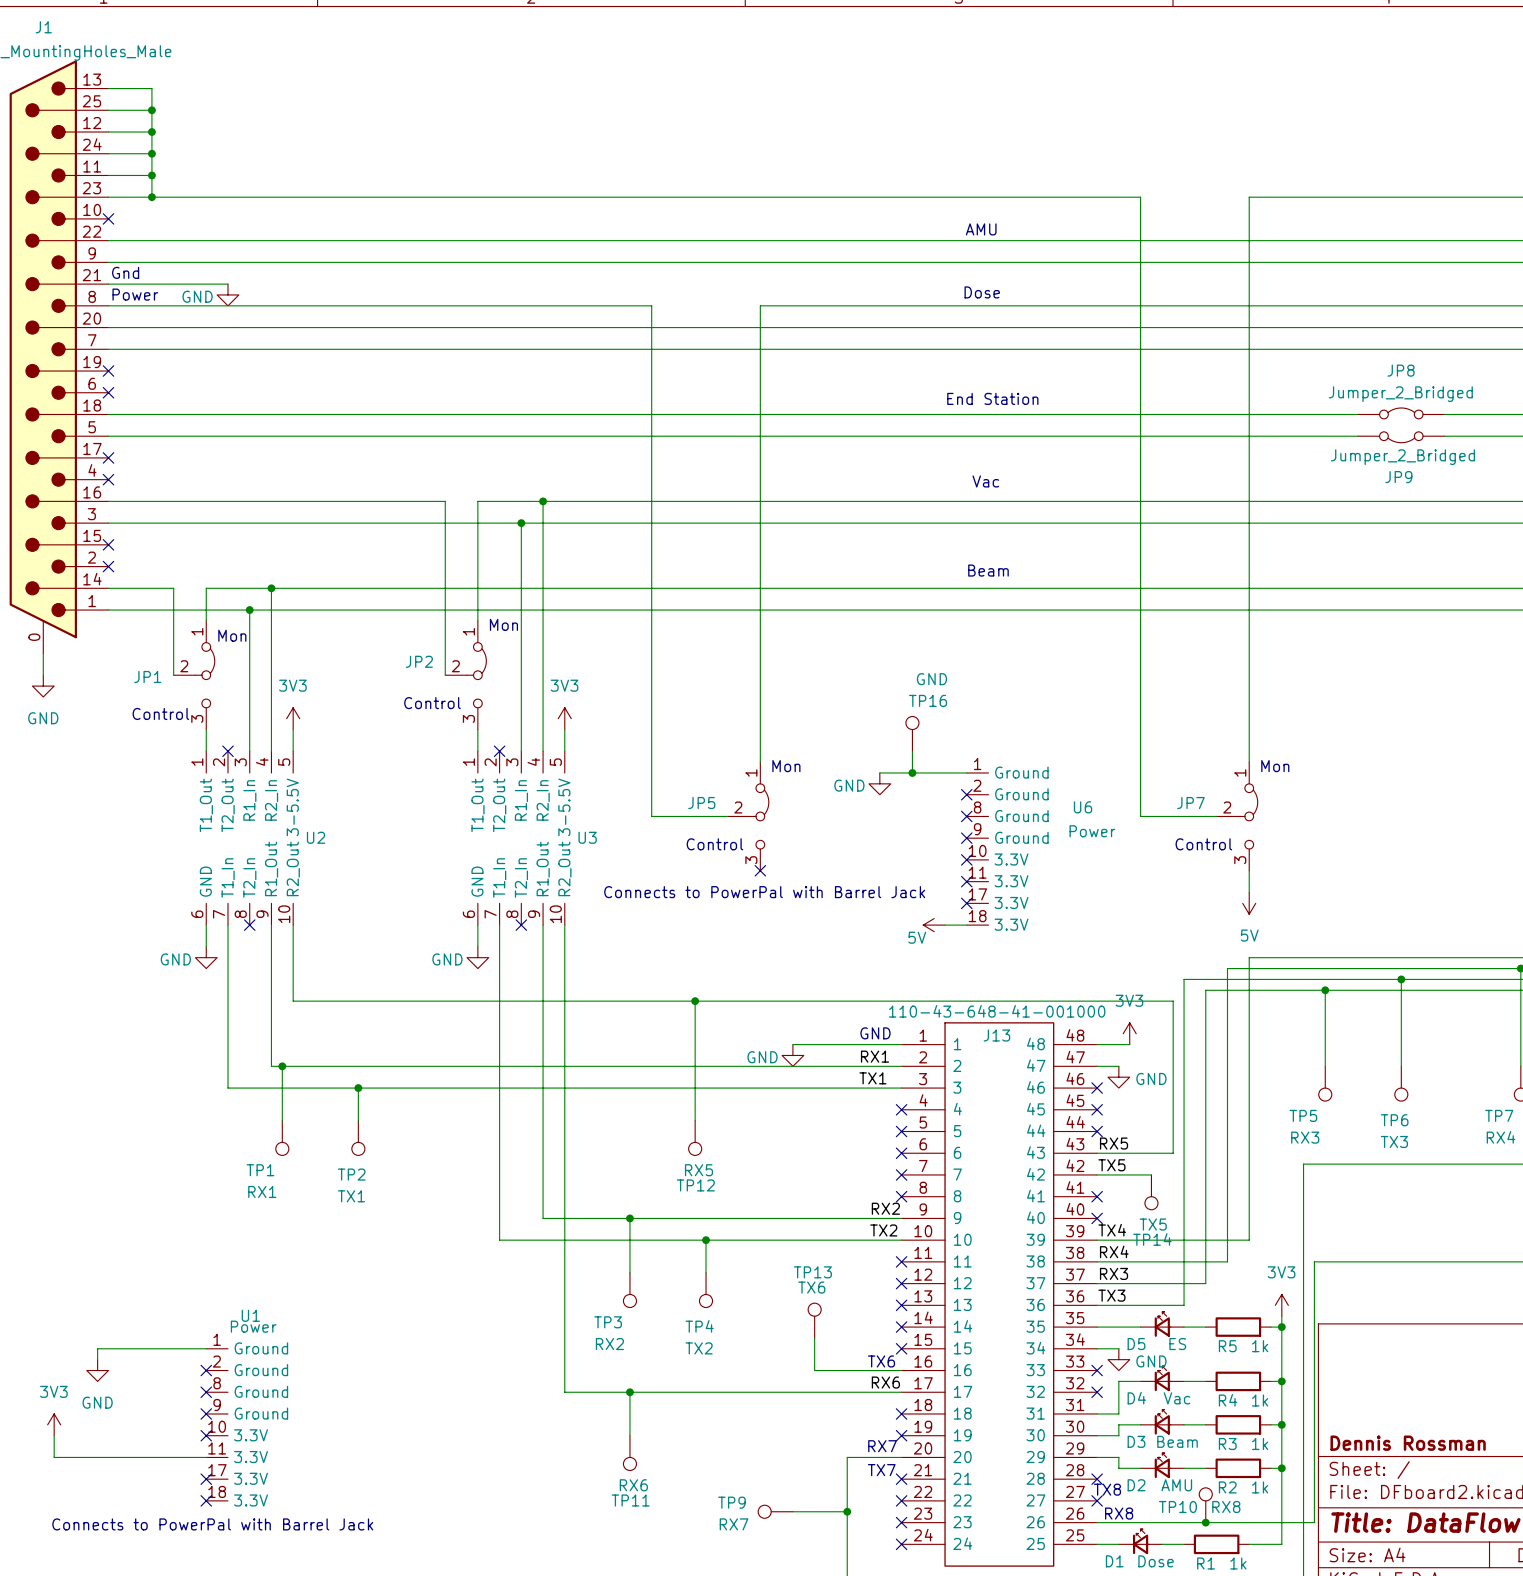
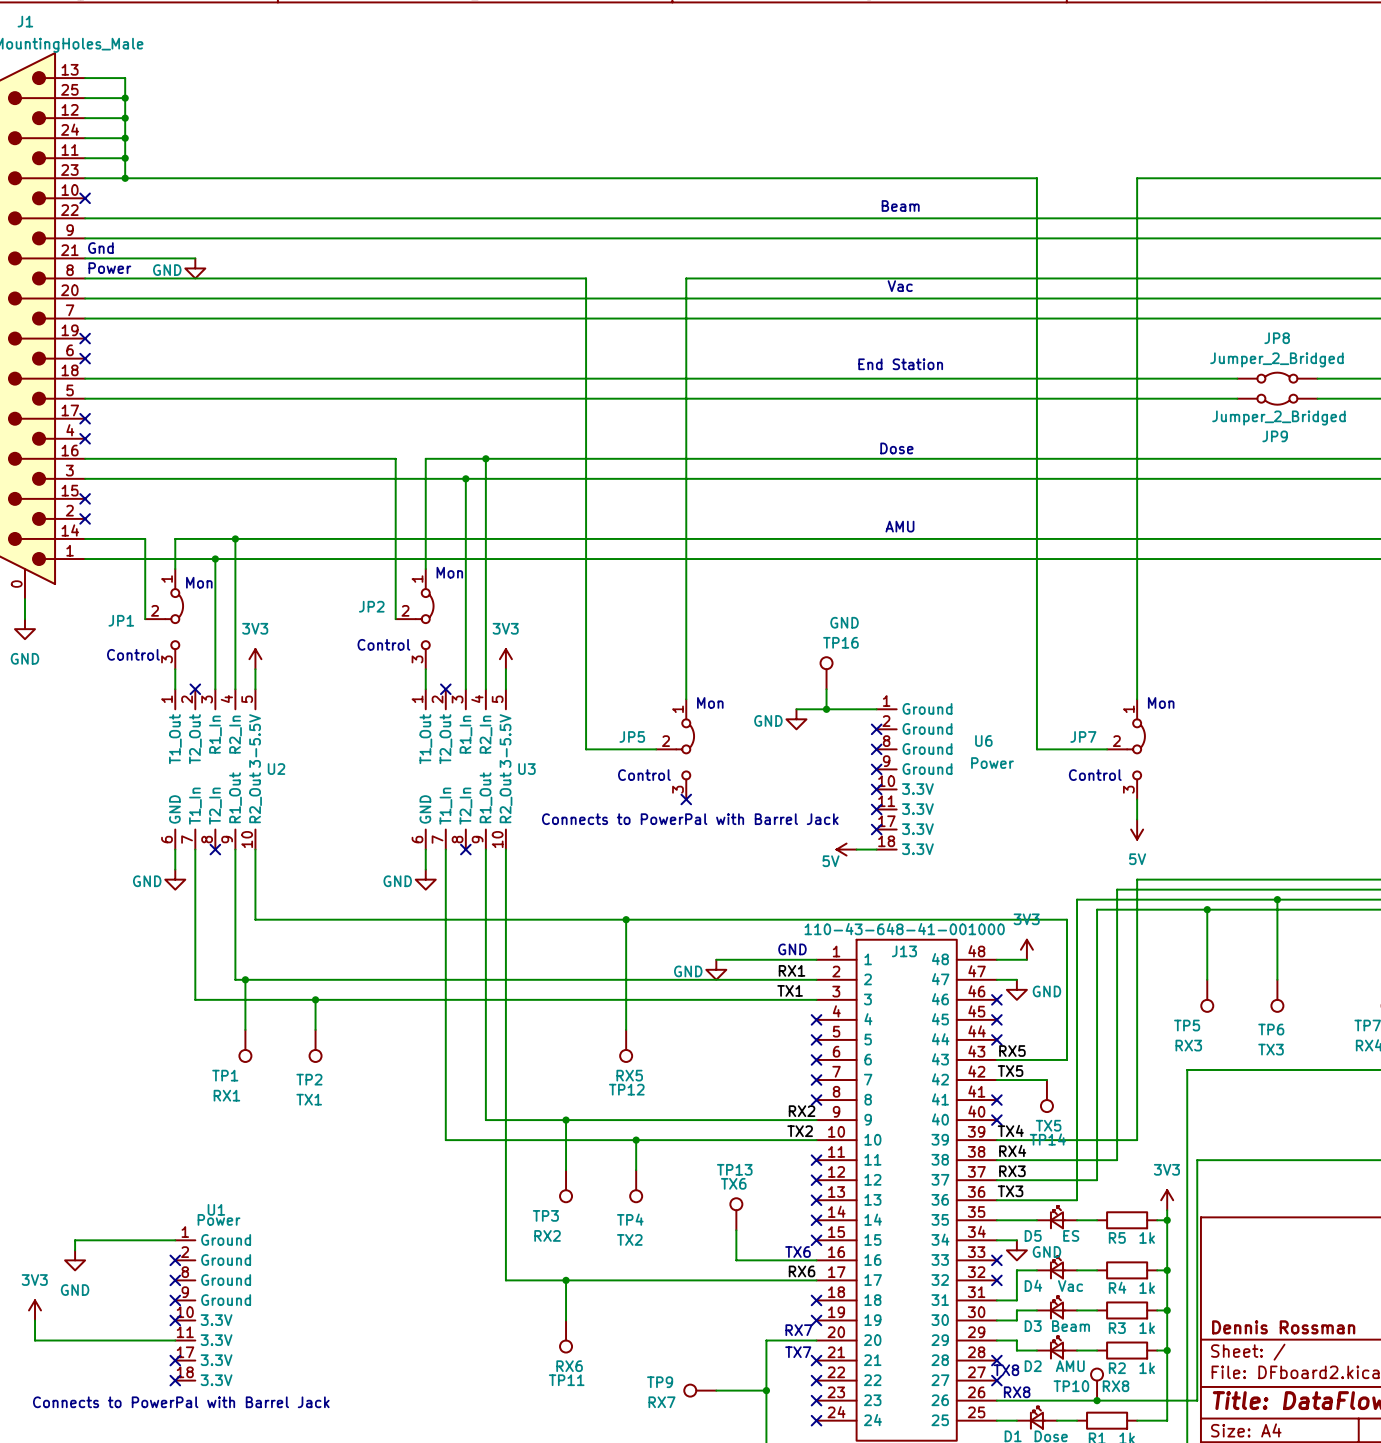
text: none -> Beam (900, 205)
text: AMU (981, 229) -> none
text position: Dose (982, 292) -> Dose (896, 448)
text position: Vac (985, 481) -> Vac (900, 286)
text: Beam (988, 570) -> AMU (899, 526)

